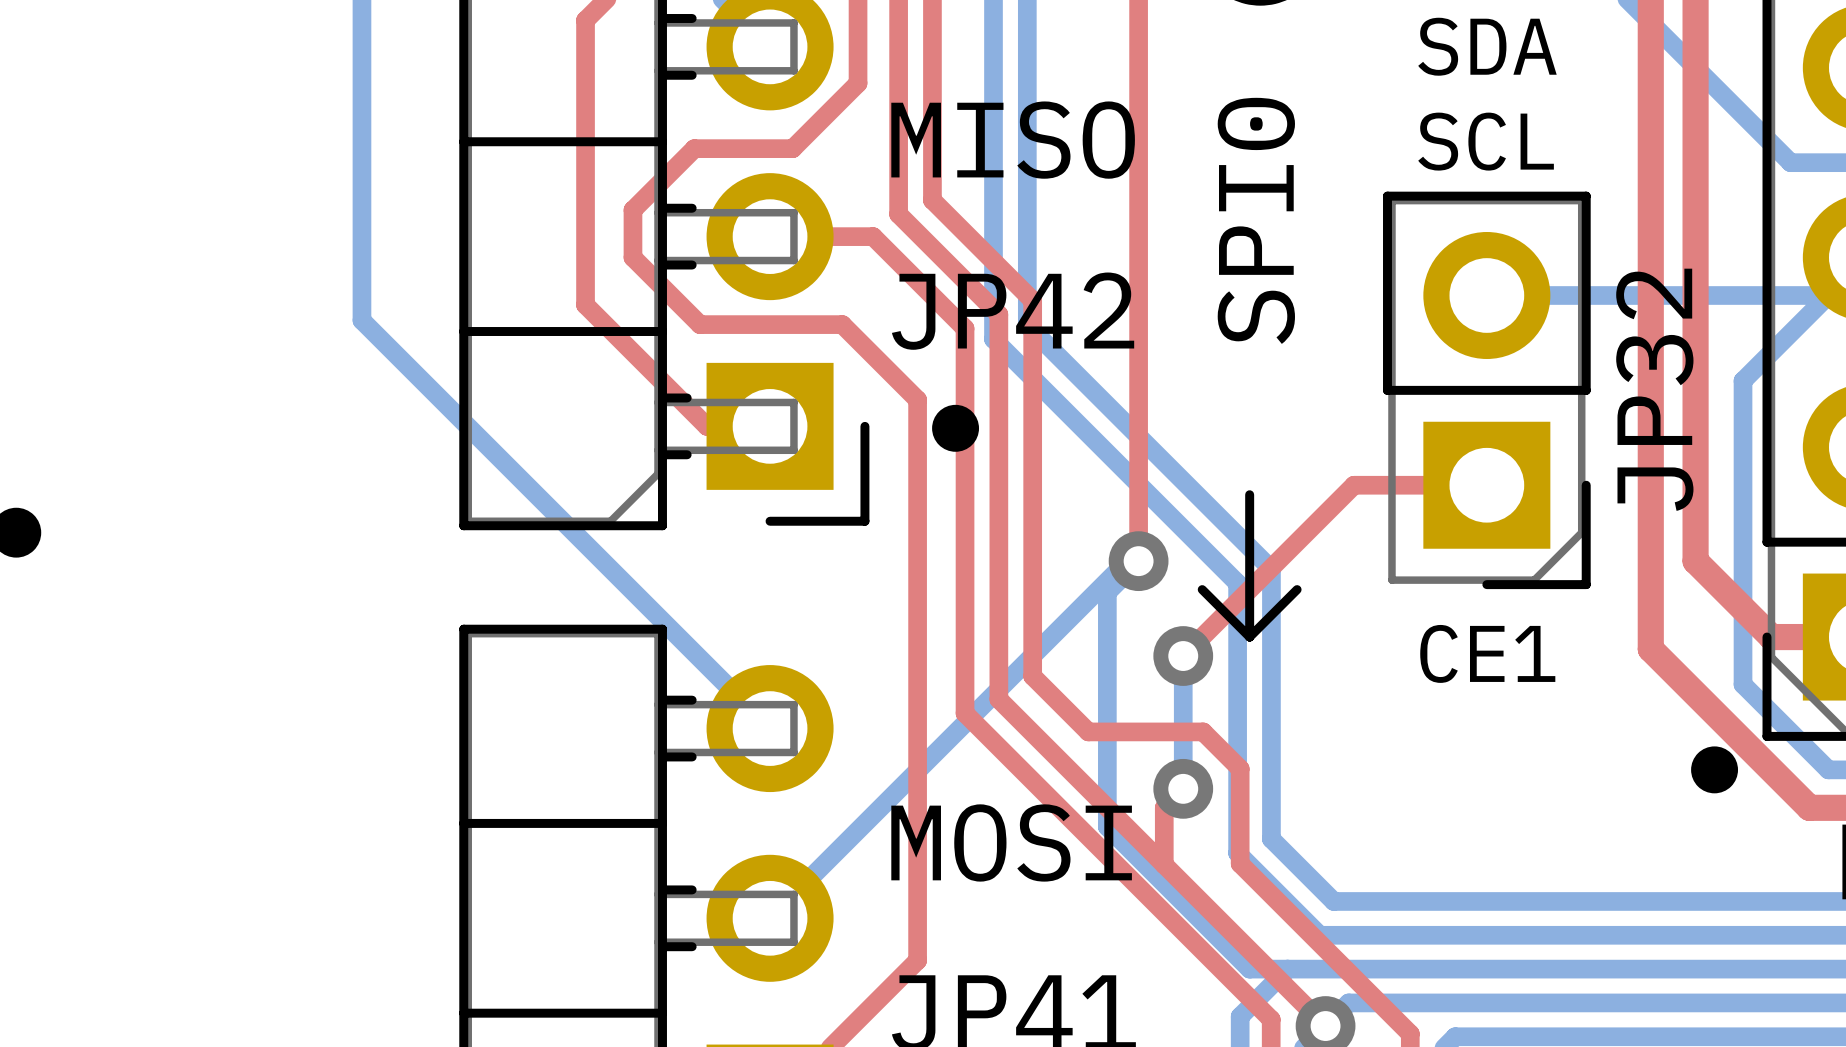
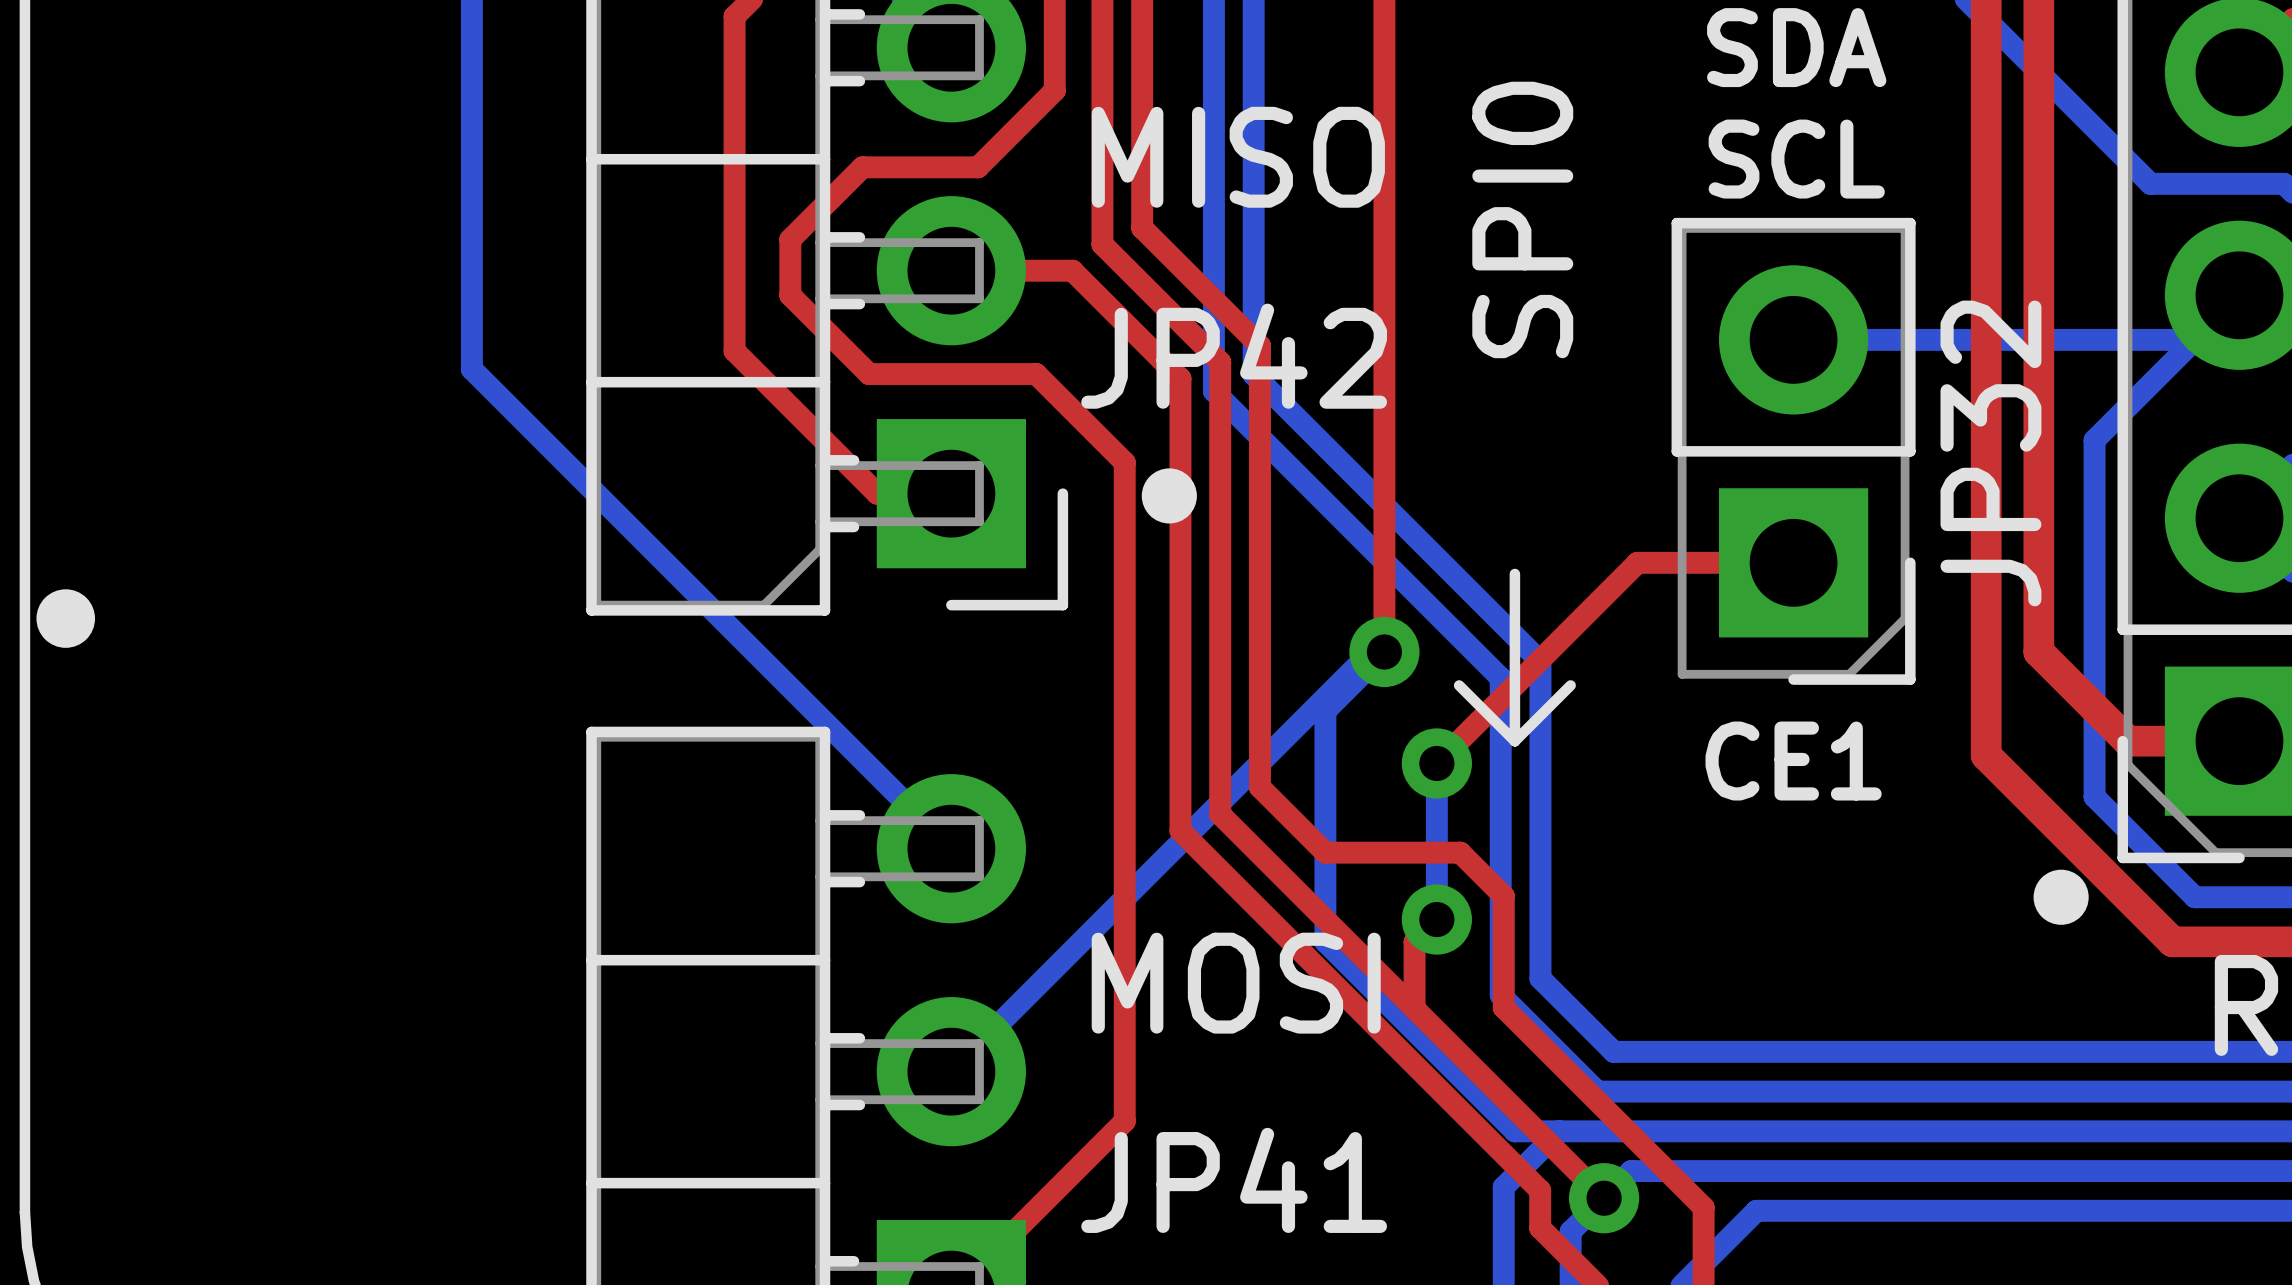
bottom track: (1107, 592) (1107, 826) -> (1347, 688) (1325, 711) (1325, 941) (1347, 964)

